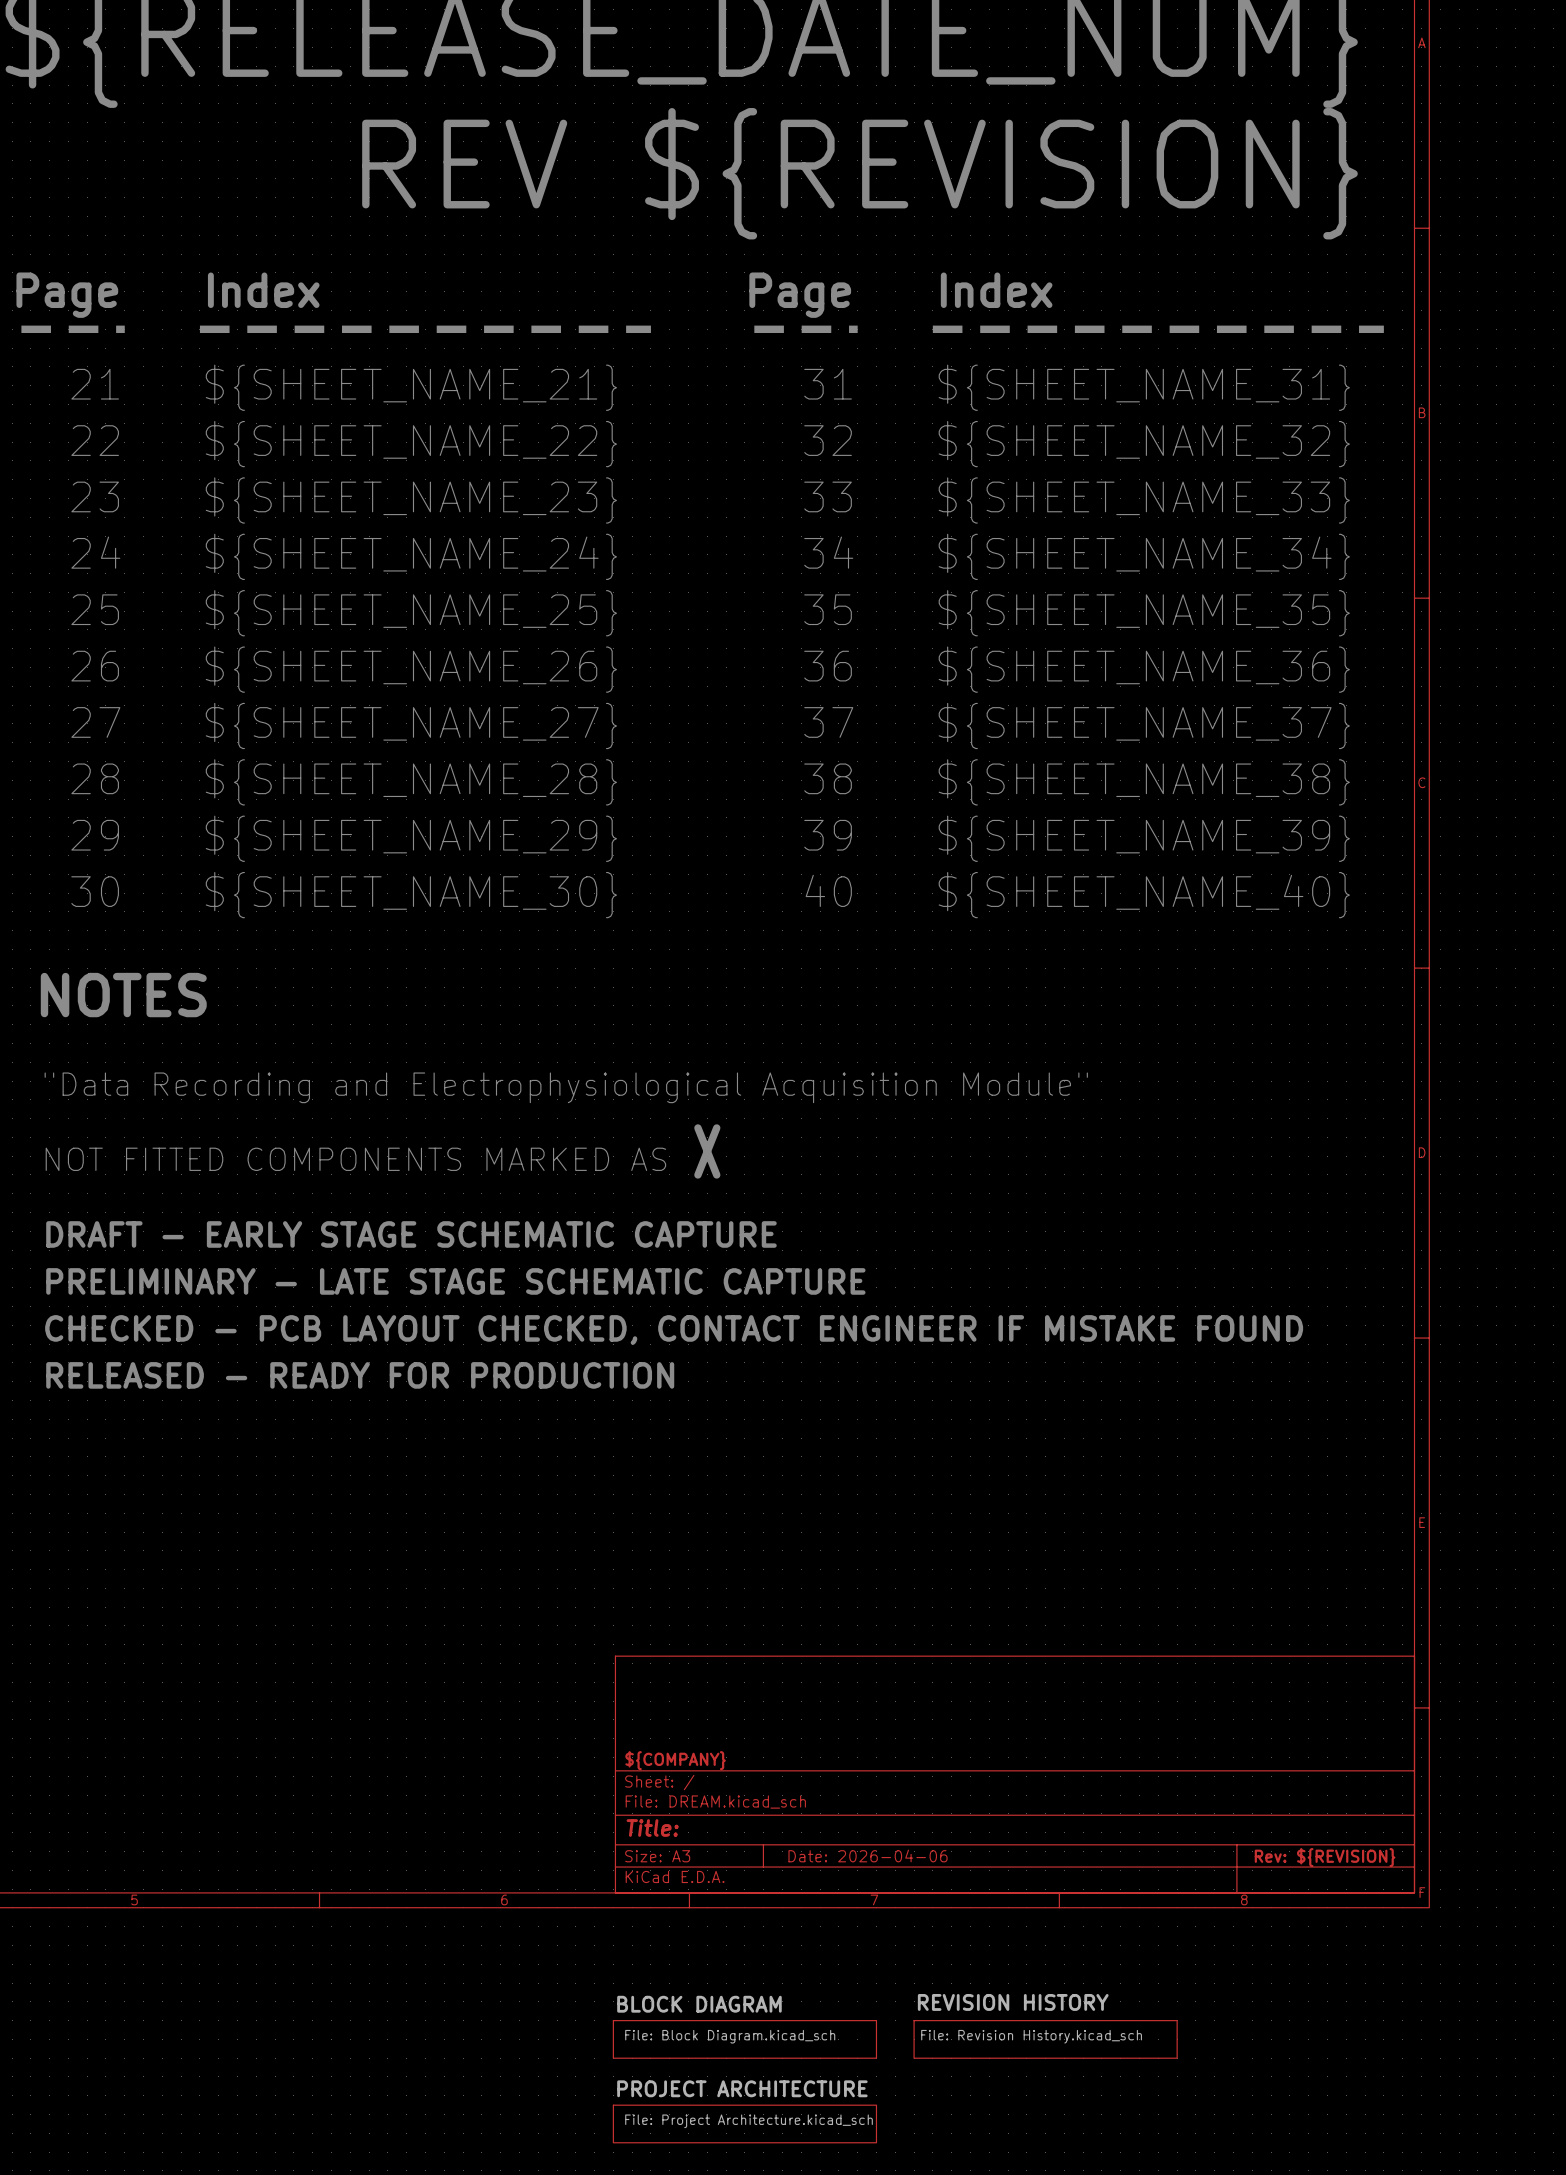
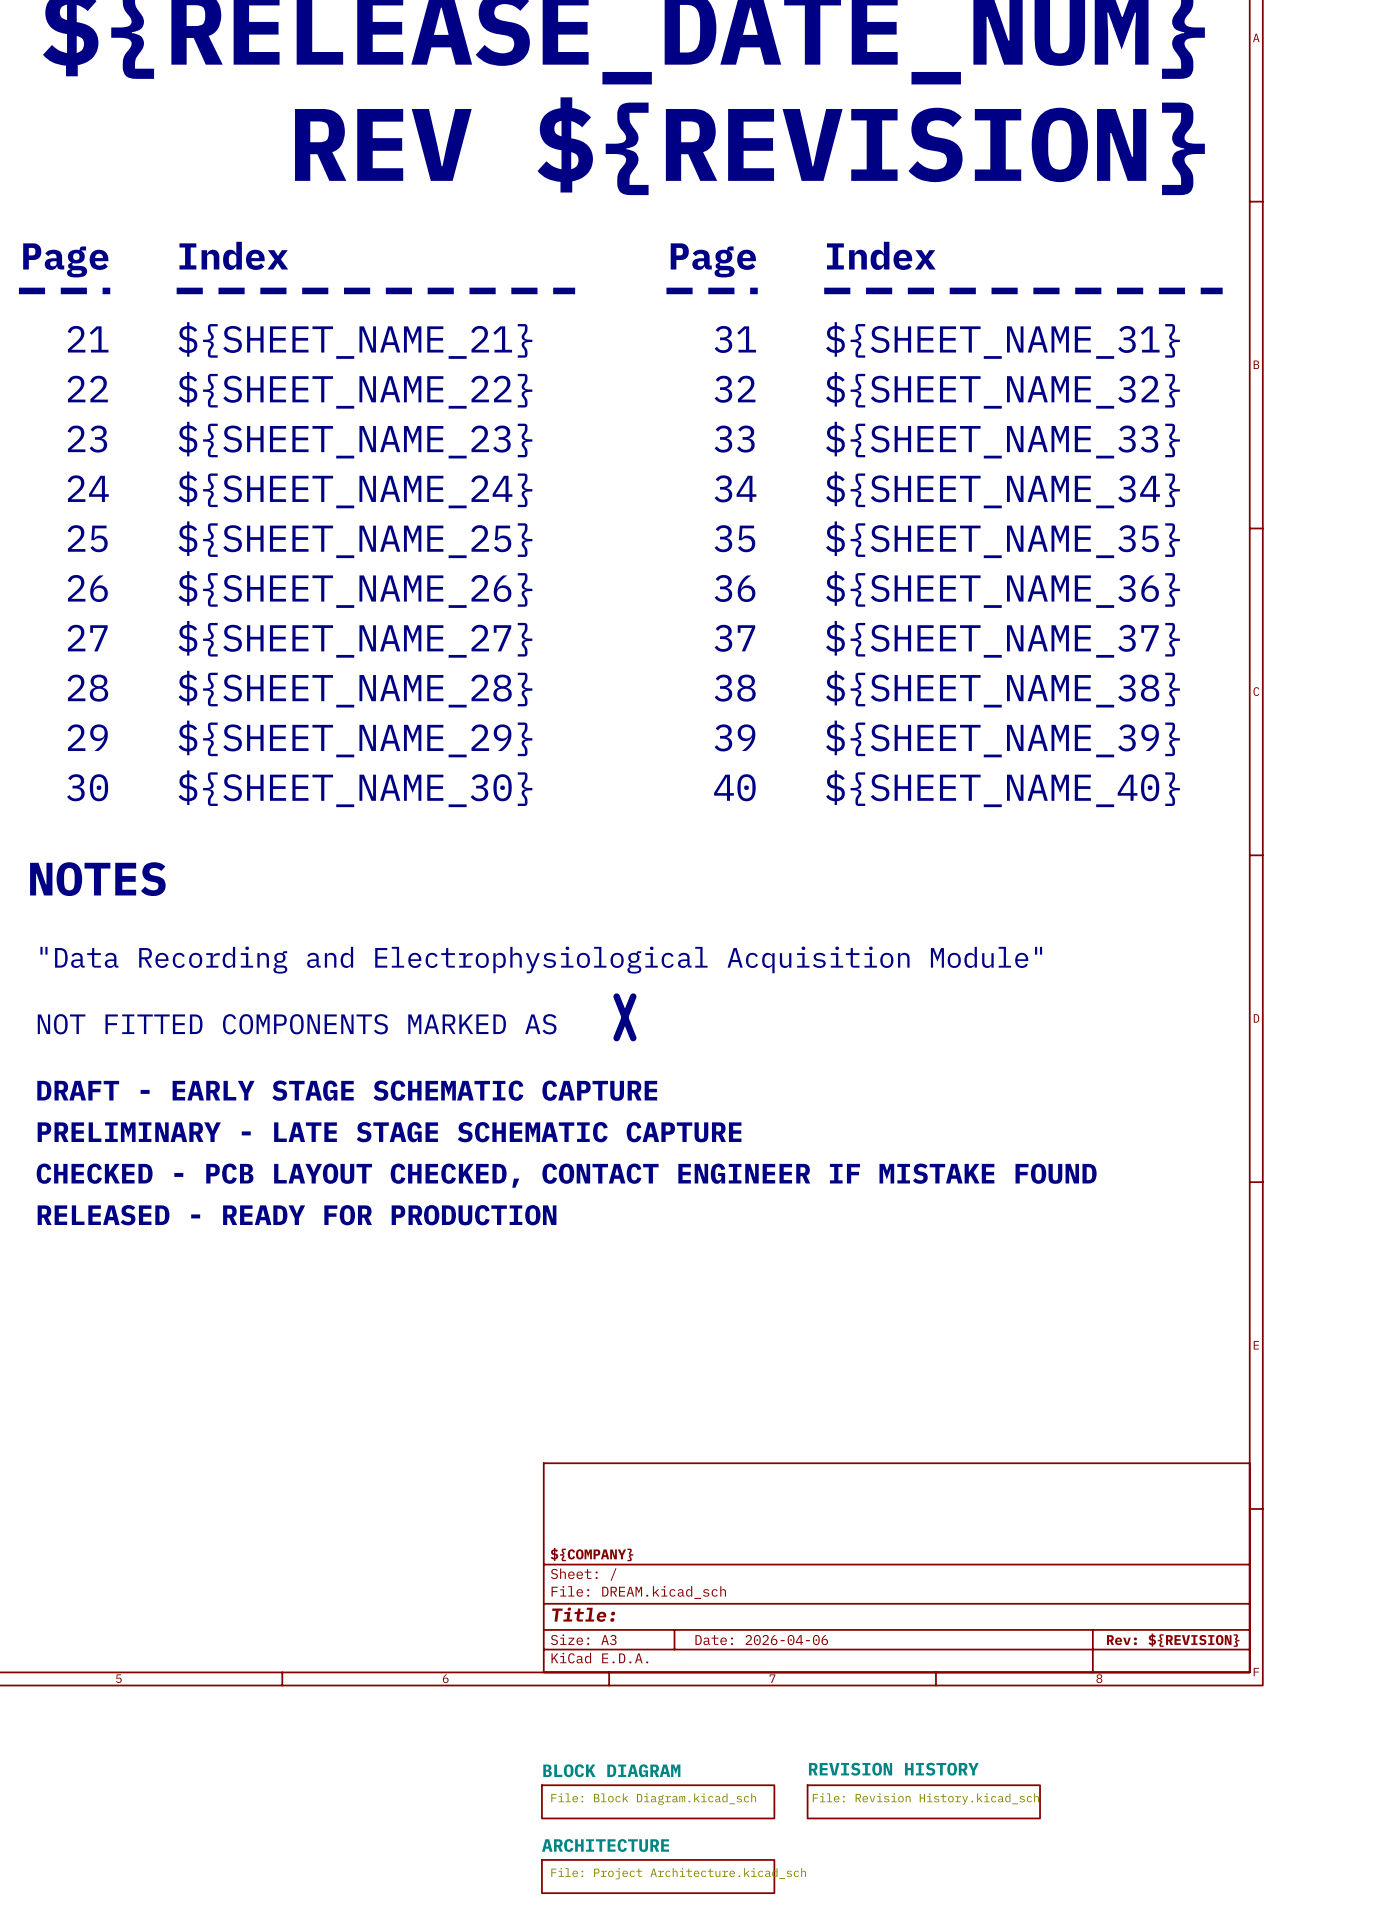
sheet PROJECT ARCHITECTURE name: PROJECT ARCHITECTURE (742, 2088) -> ARCHITECTURE (605, 1845)

